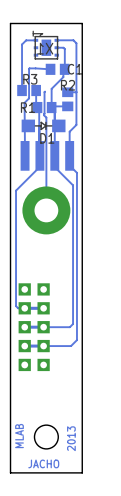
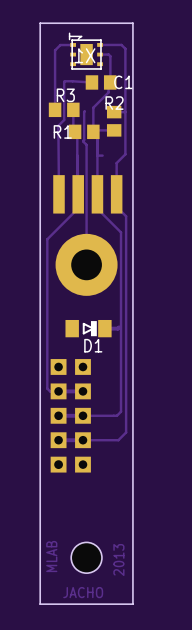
D1 footprint: [21, 119, 66, 133] -> [65, 319, 112, 338]
track: none -> (119, 327) (104, 328)

